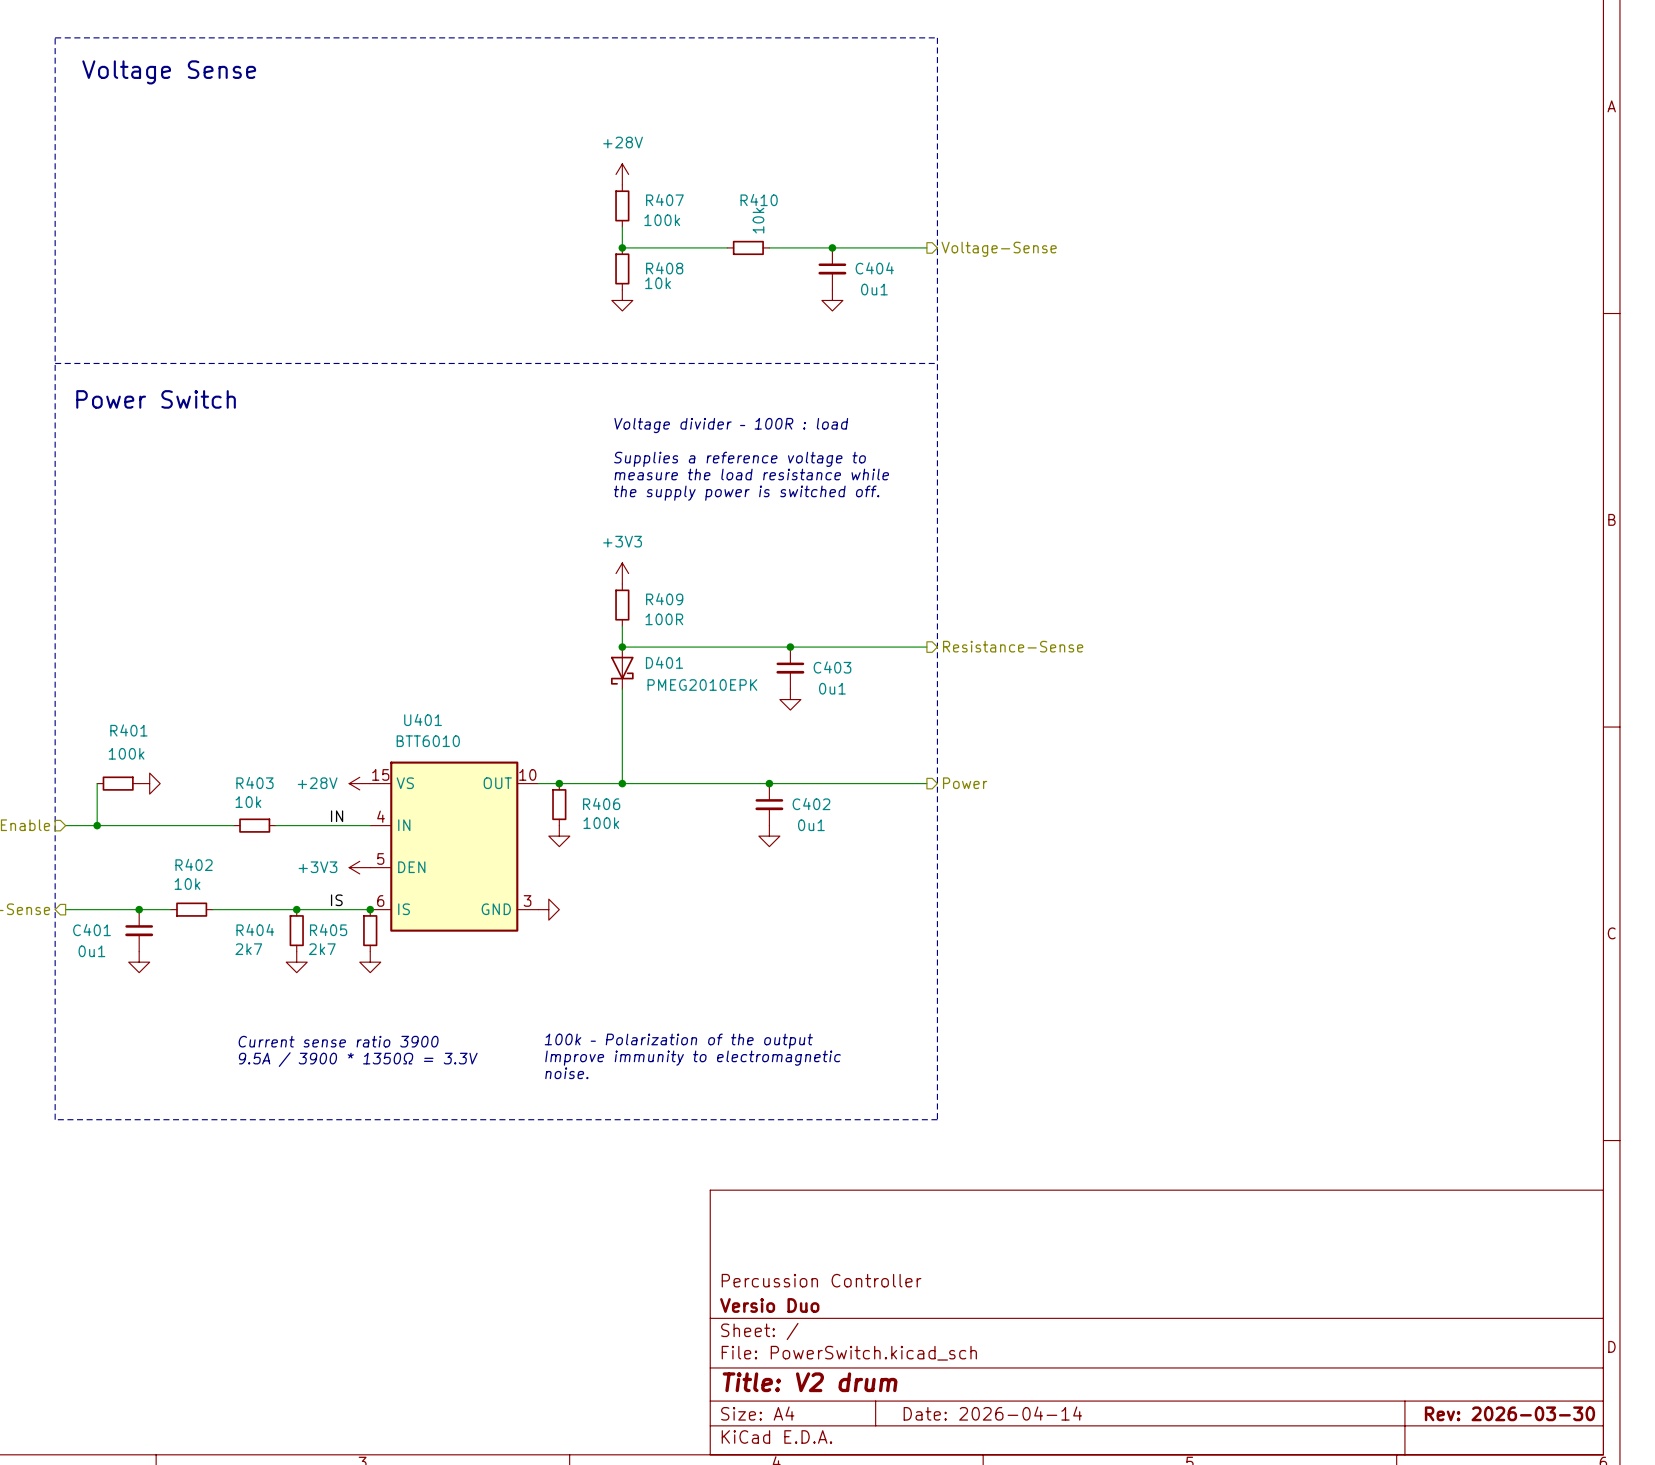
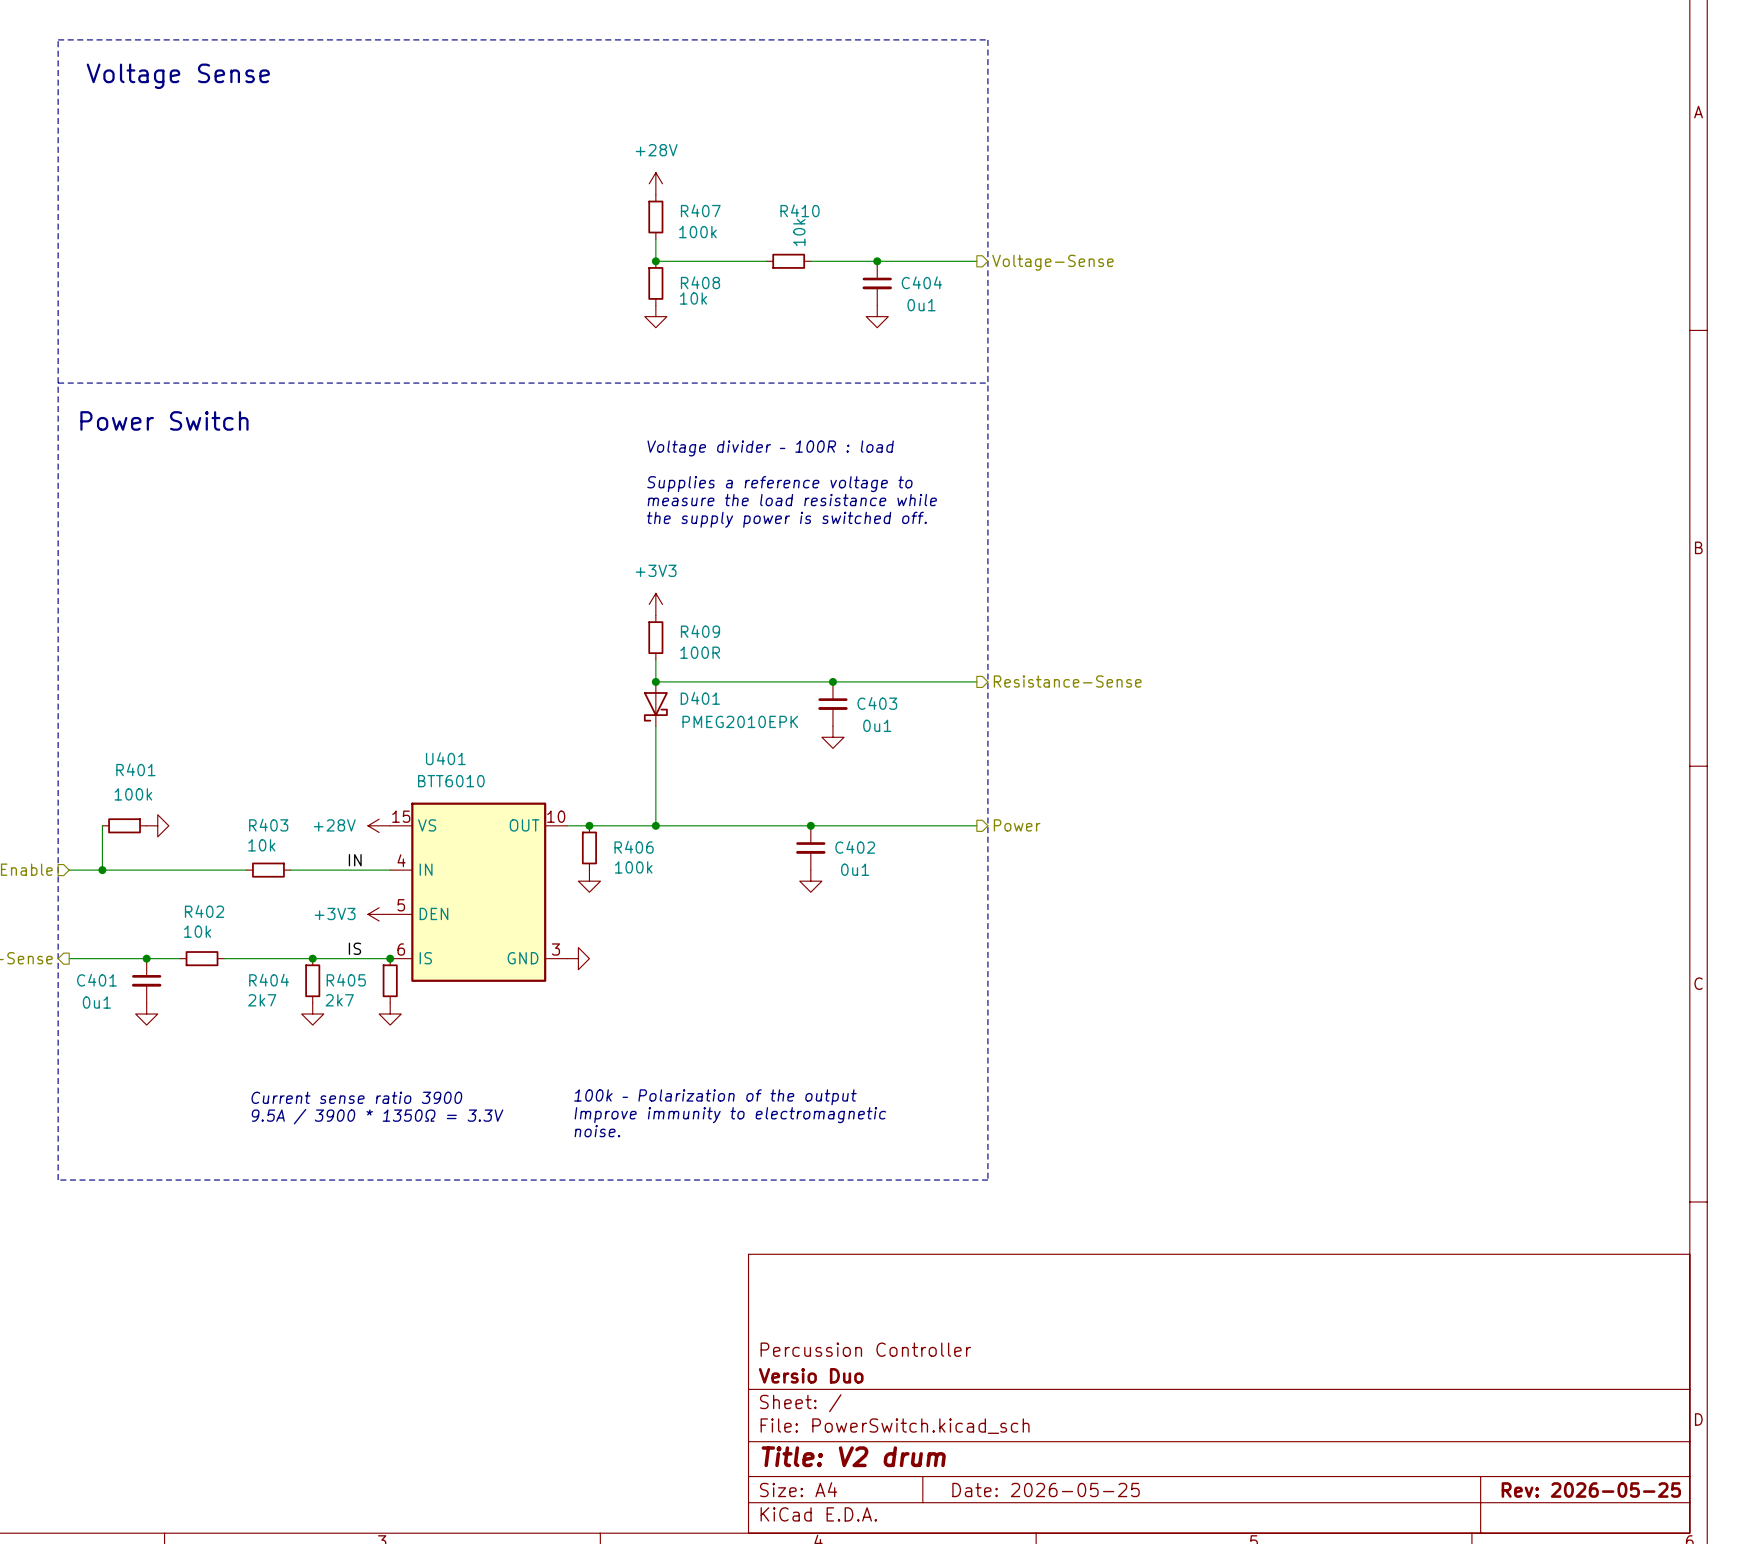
title block: Date: 2026-04-14 (992, 1413) -> Date: 2026-05-25 (1046, 1490)
title block: Rev: 2026-03-30 (1509, 1413) -> Rev: 2026-05-25 (1591, 1490)

